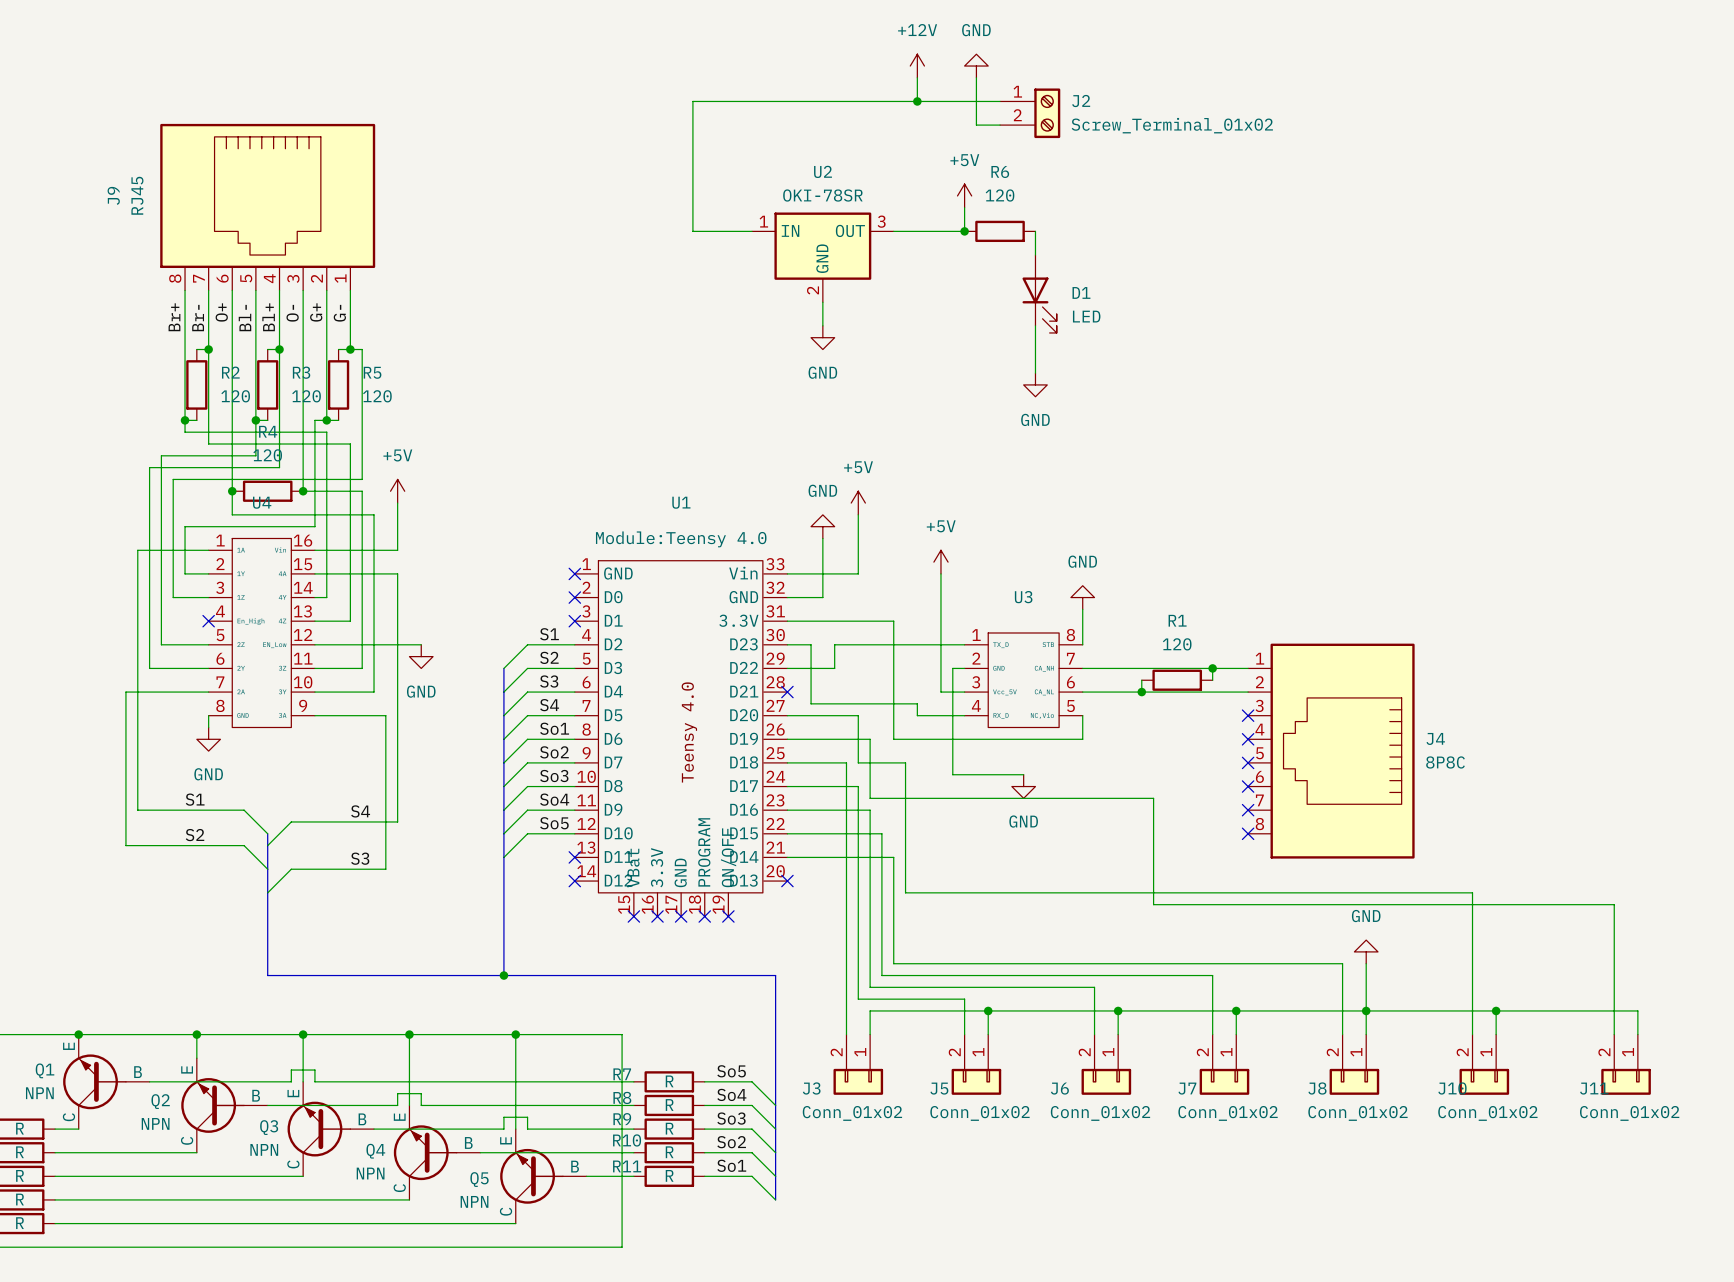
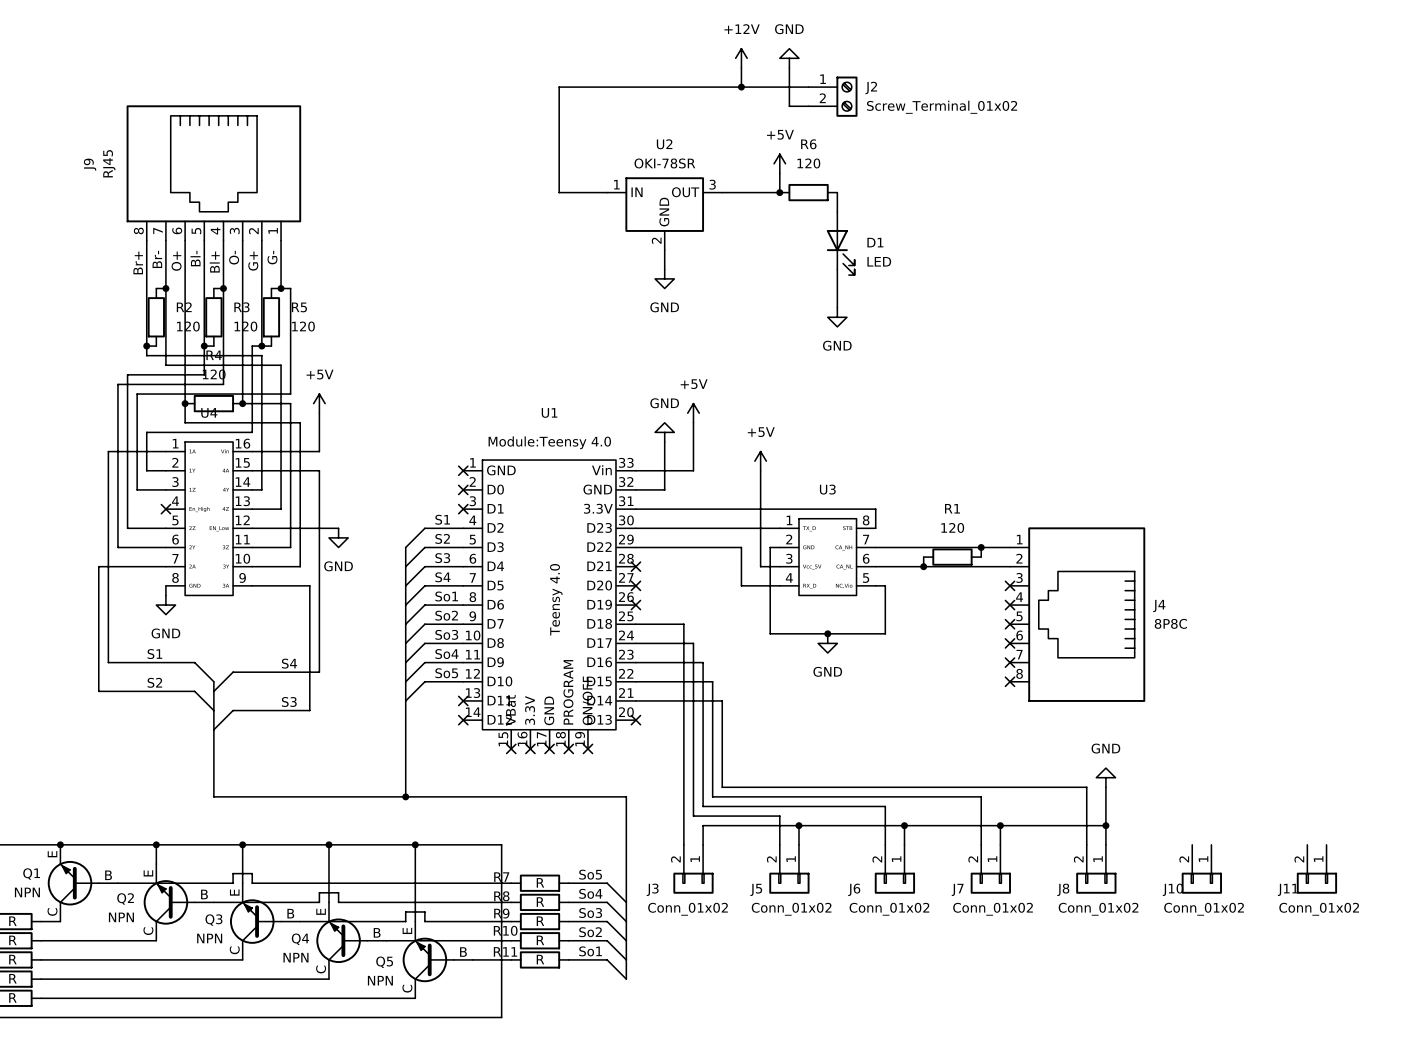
power symbol: GND (1082, 597) -> none
wire: (1082, 609) (1082, 621) -> none
wire: (893, 621) (893, 739) (1082, 739) (1082, 715) -> (722, 509) (875, 509)
wire: (811, 644) (811, 703) (917, 703) -> (674, 547) (741, 547) (741, 576)
wire: (834, 644) (834, 668) -> (674, 528) (655, 528)
wire: (787, 715) (858, 715) (858, 762) (905, 762) (905, 892) (1472, 892) (1472, 1034) -> none
no-connect mark: none -> (635, 585)
wire: none -> (875, 585) (885, 585) (885, 633) (827, 633)
wire: (787, 739) (870, 739) (870, 798) (1153, 798) (1153, 904) (1614, 904) (1614, 1034) -> none
no-connect mark: none -> (635, 605)
junction: none -> (827, 633)
wire: (1366, 1010) (1637, 1010) (1637, 1034) -> none
wire: (1496, 1010) (1496, 1034) -> none
junction: (1496, 1010) -> none

